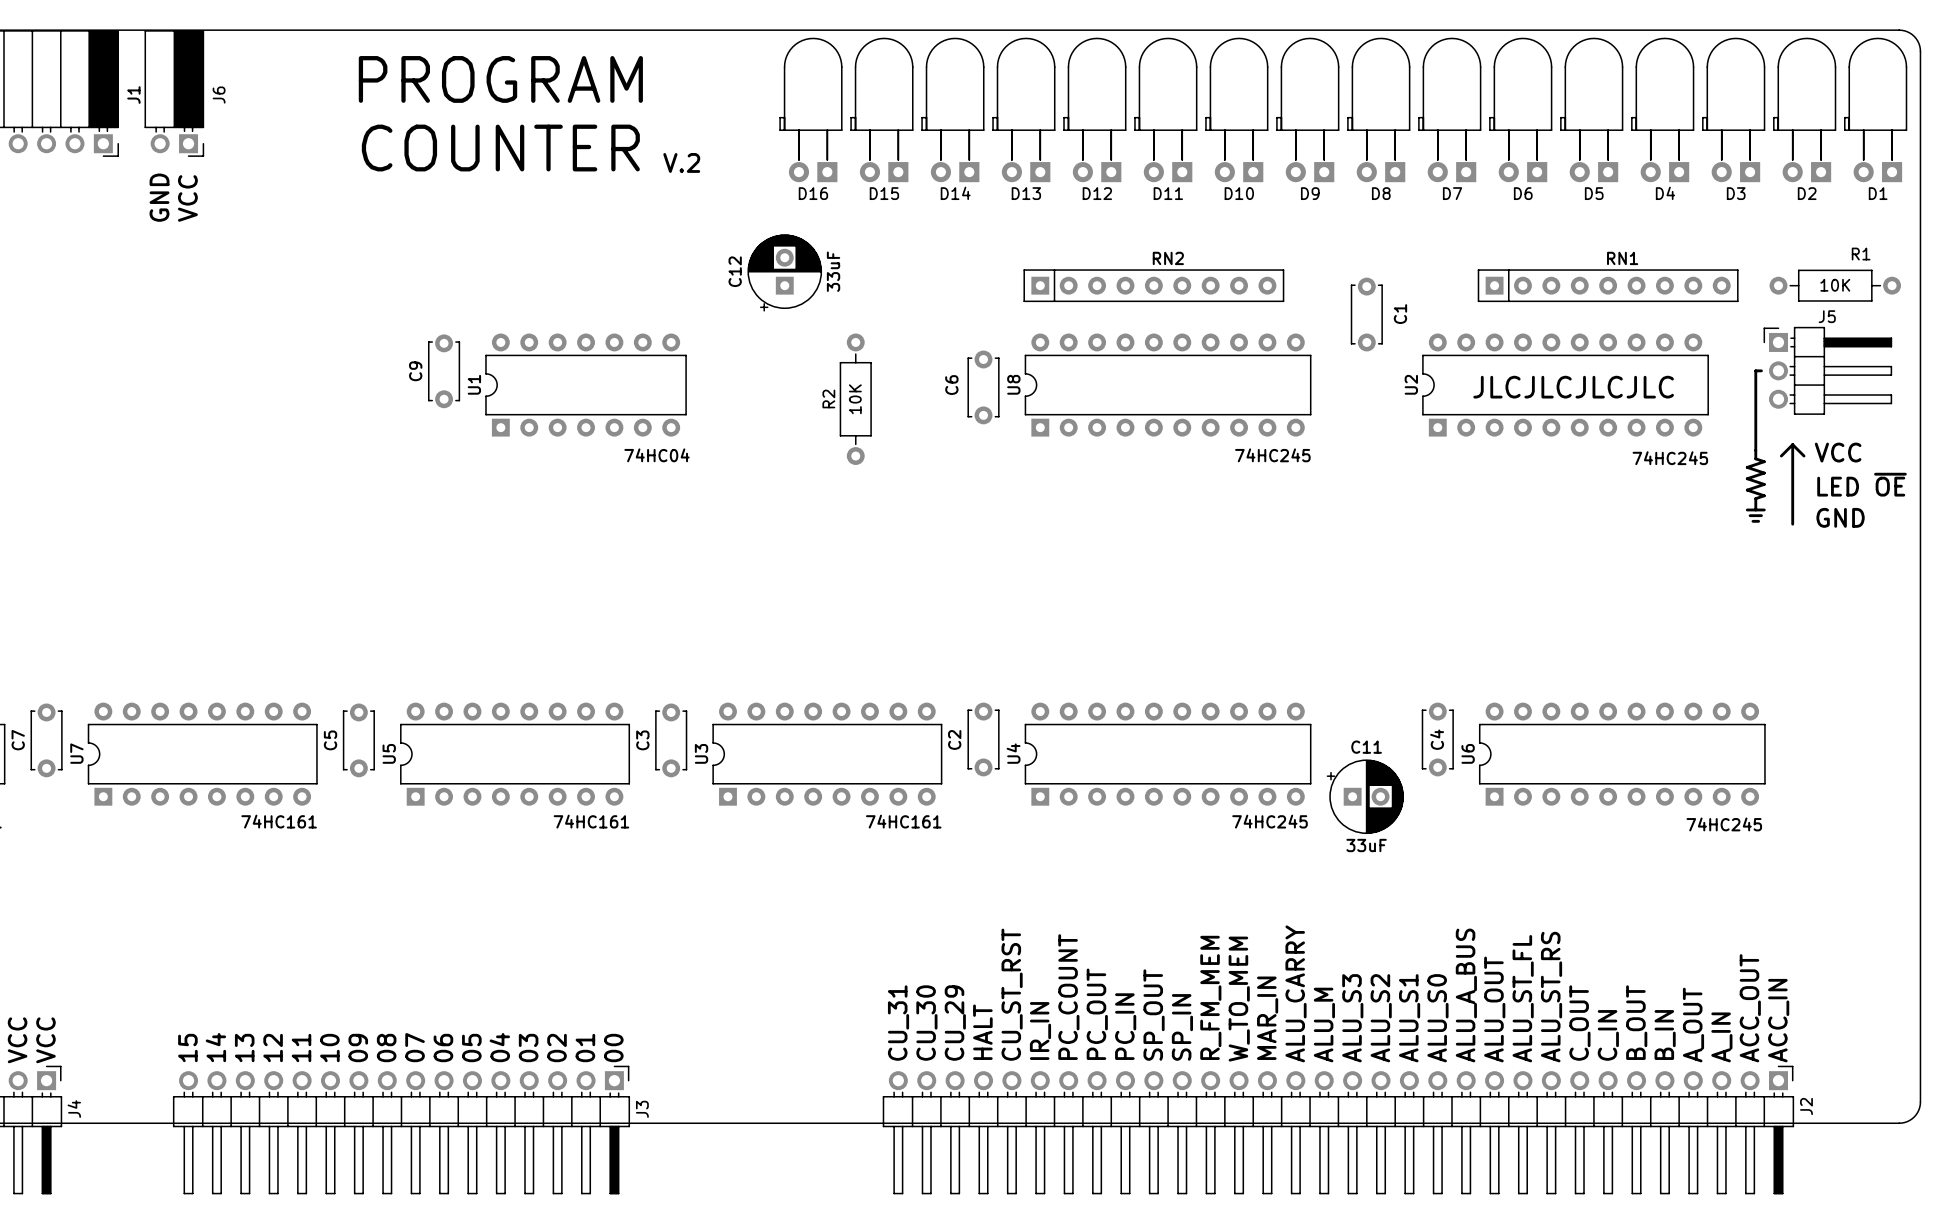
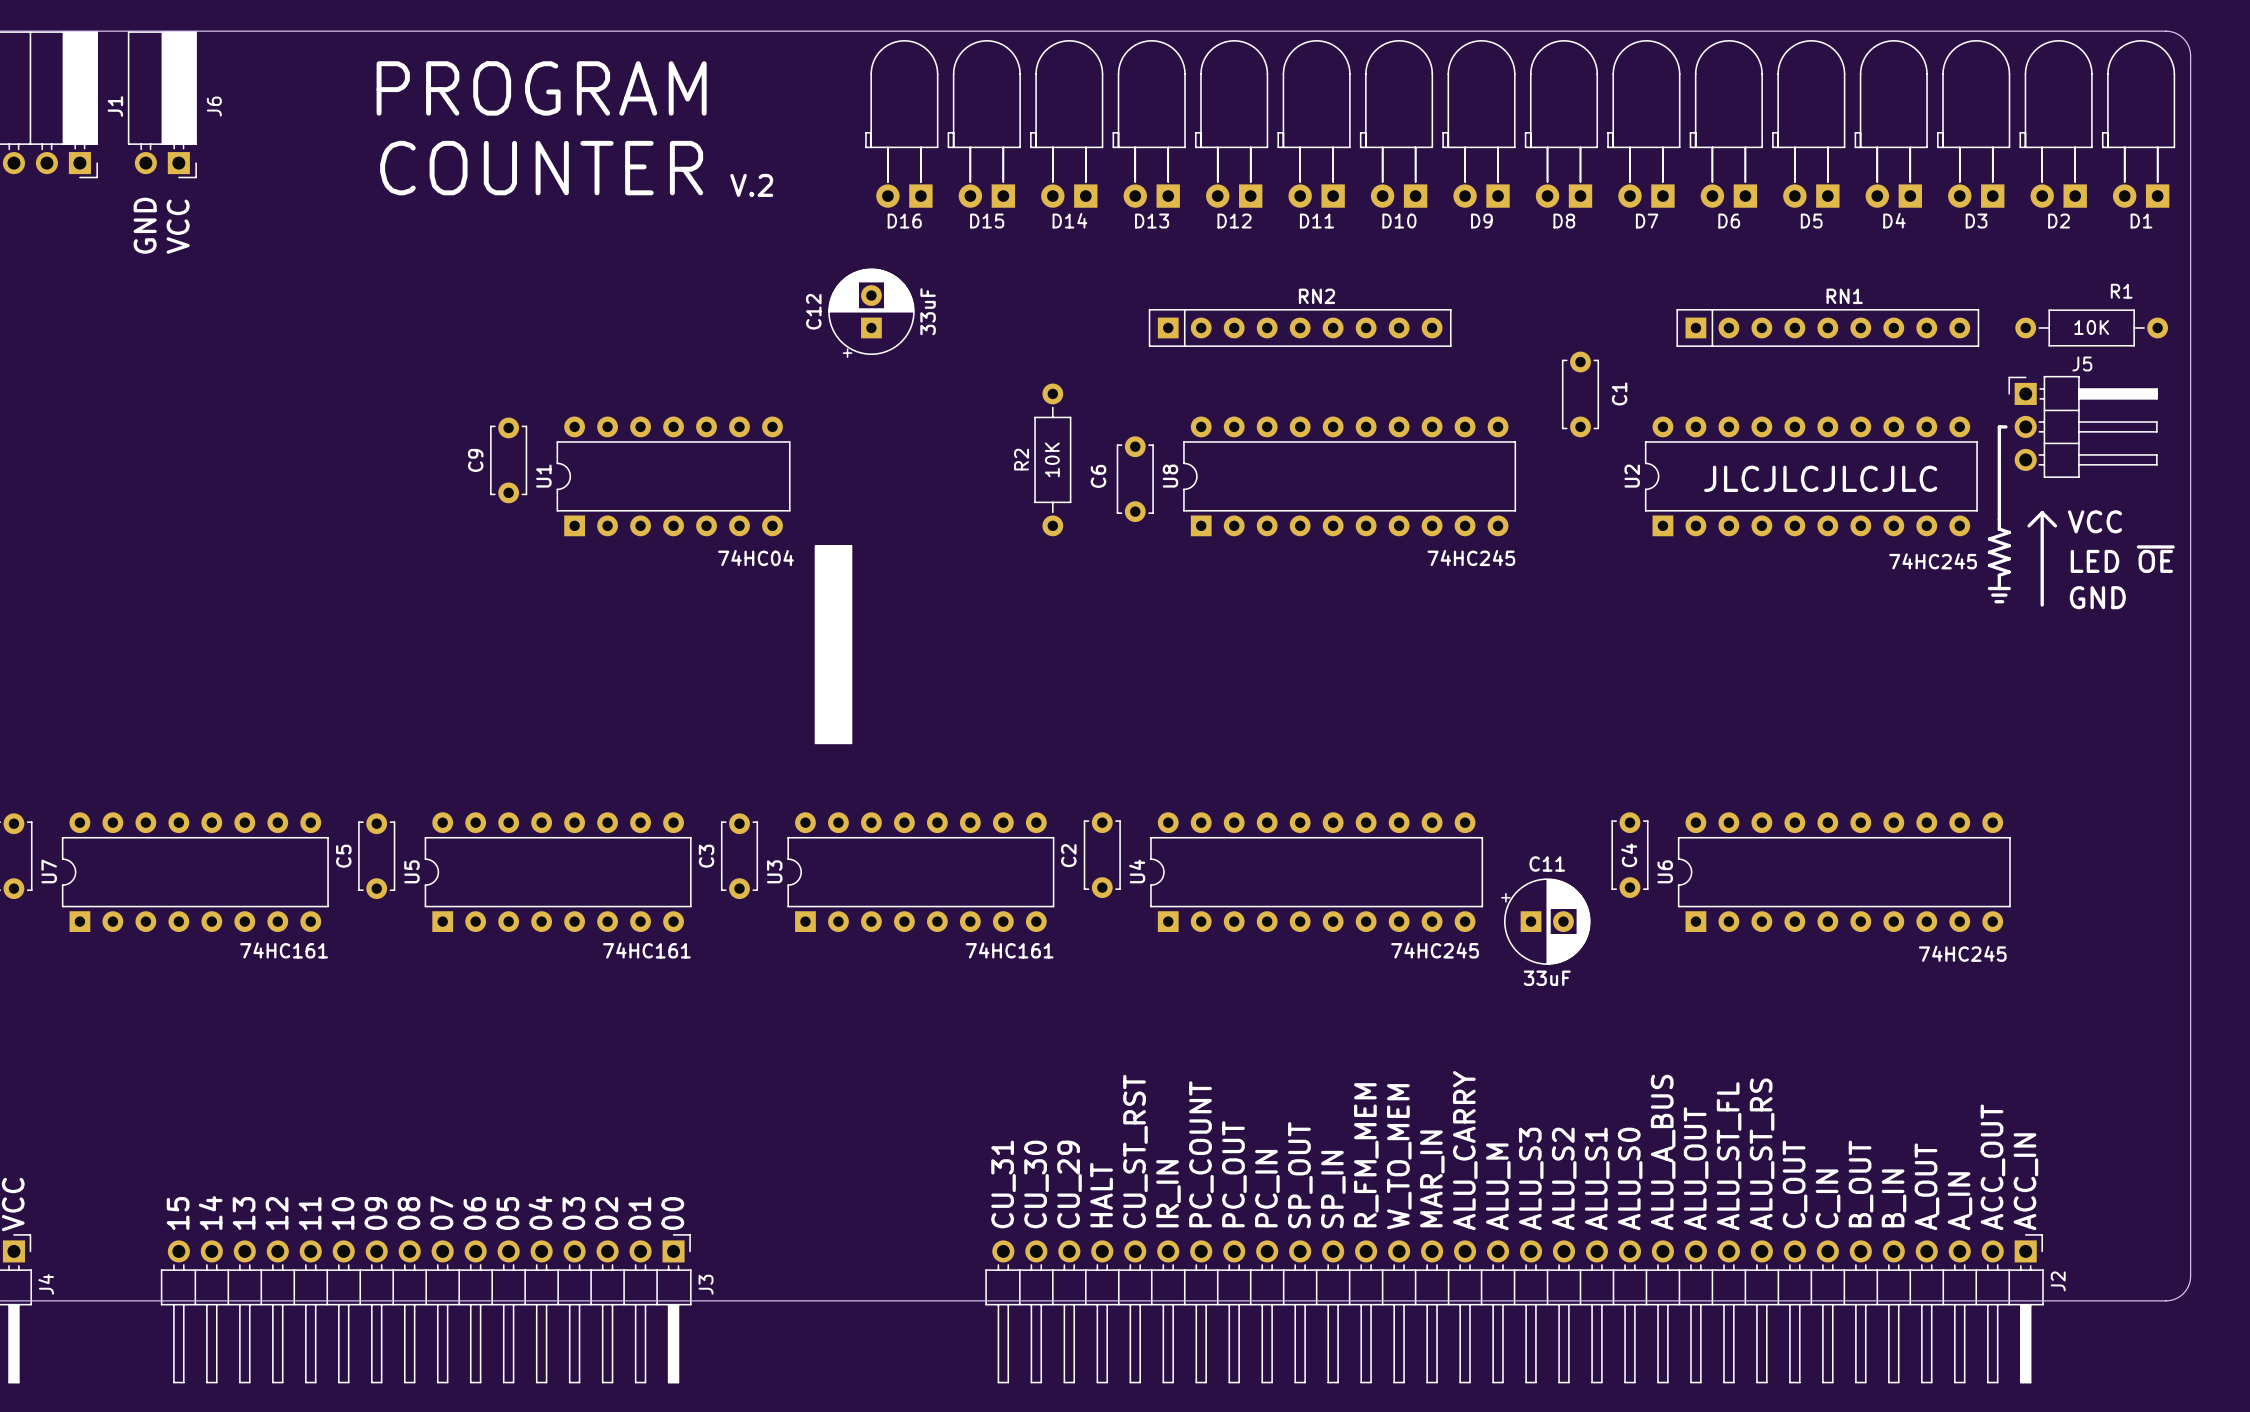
C1 position: (1366, 314) -> (1580, 394)
C9 position: (444, 371) -> (508, 460)
U1 position: (586, 385) -> (673, 476)
U8 position: (1168, 385) -> (1349, 476)
U2 position: (1565, 385) -> (1811, 476)
C6 position: (983, 387) -> (1135, 479)
text position: JLCJLCJLCJLC (1573, 387) -> JLCJLCJLCJLC (1820, 478)
R2 position: (855, 399) -> (1052, 459)
drawing: none -> [814, 545, 853, 745]

